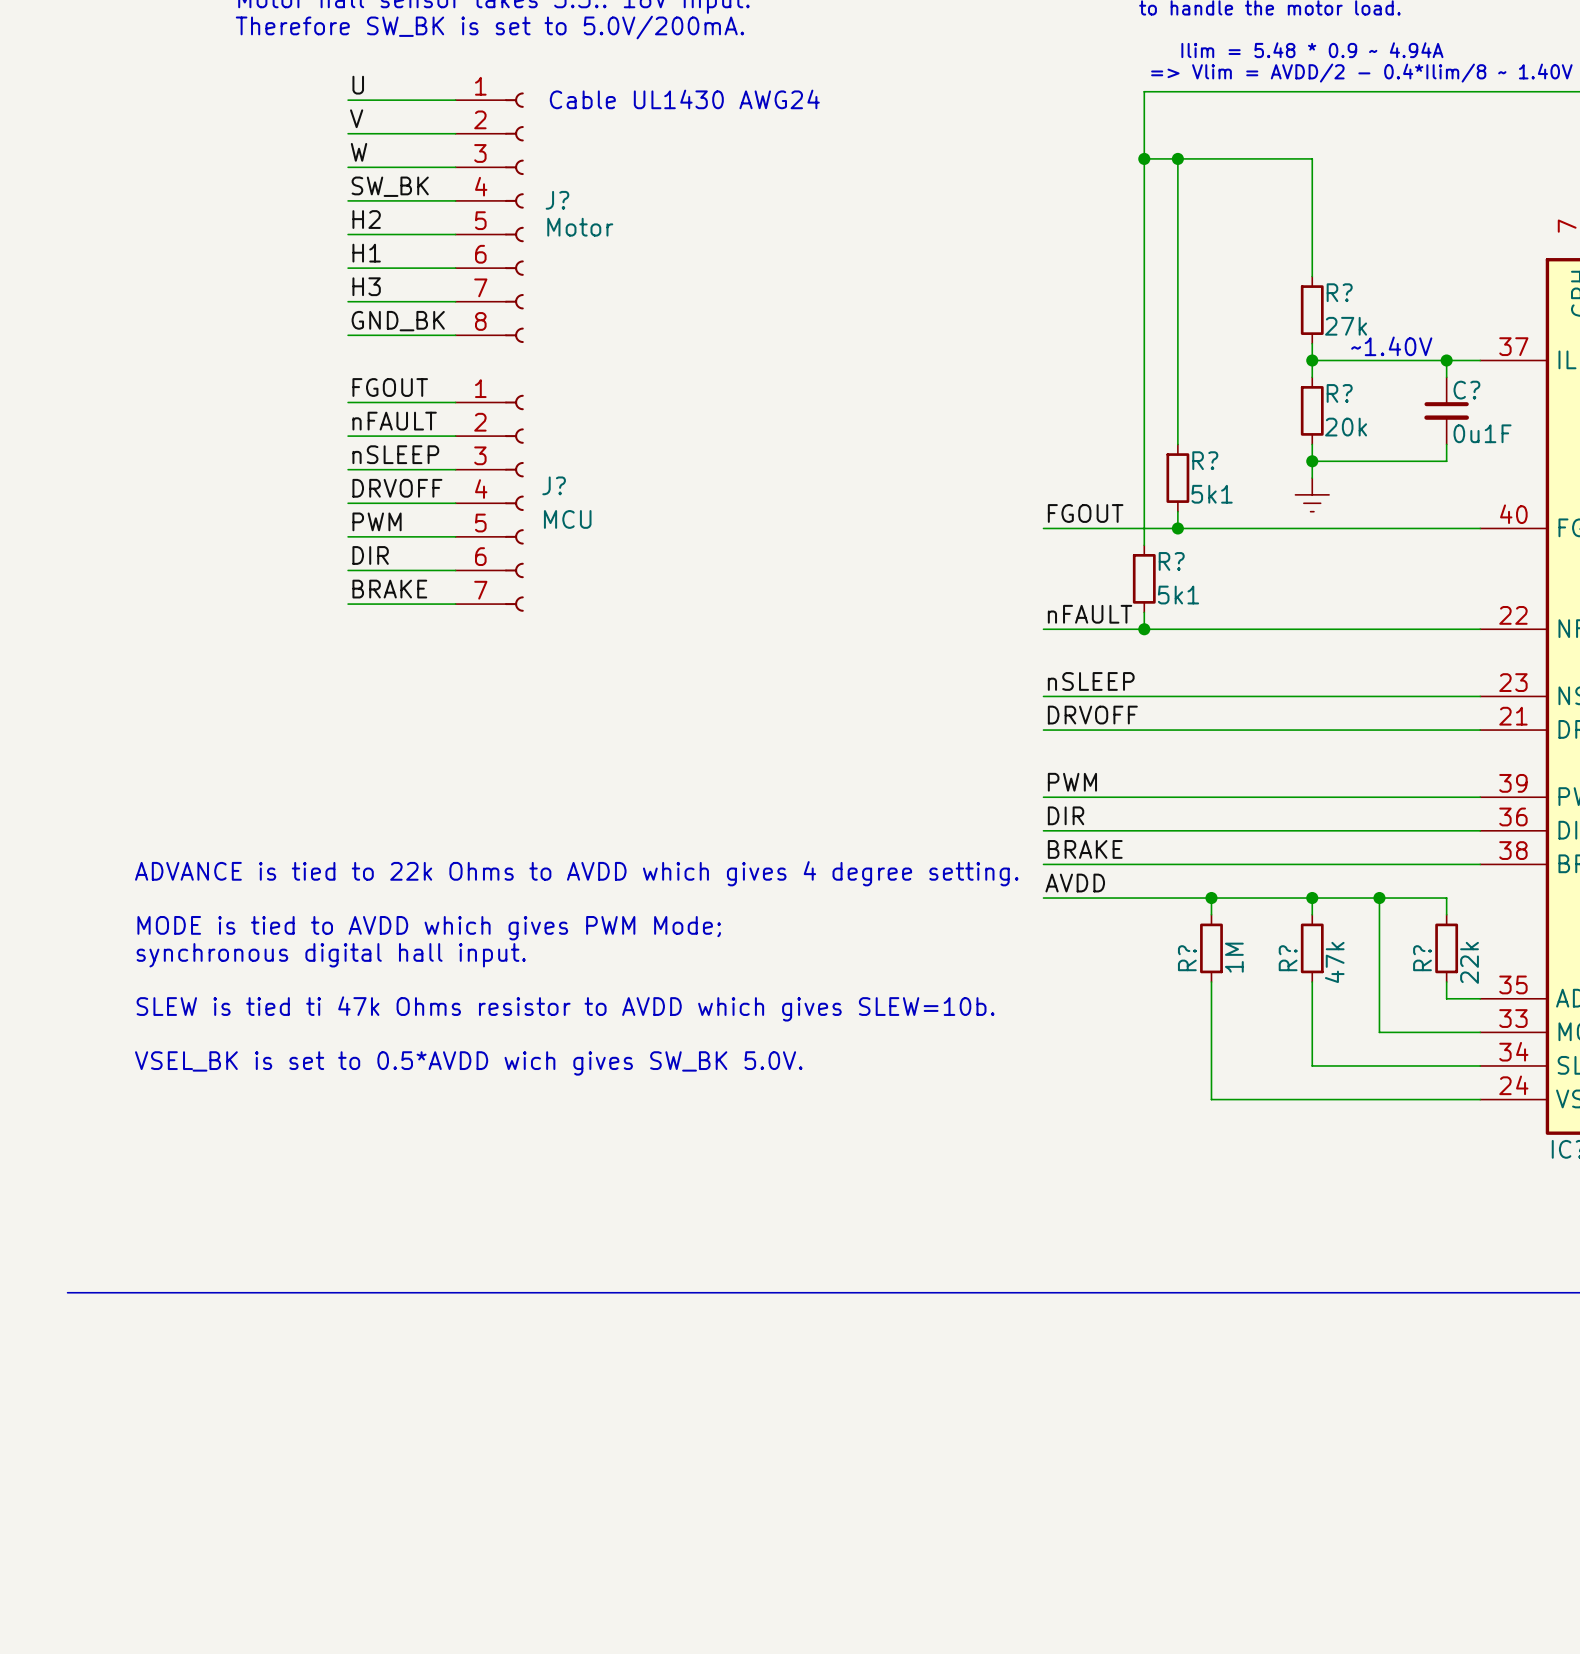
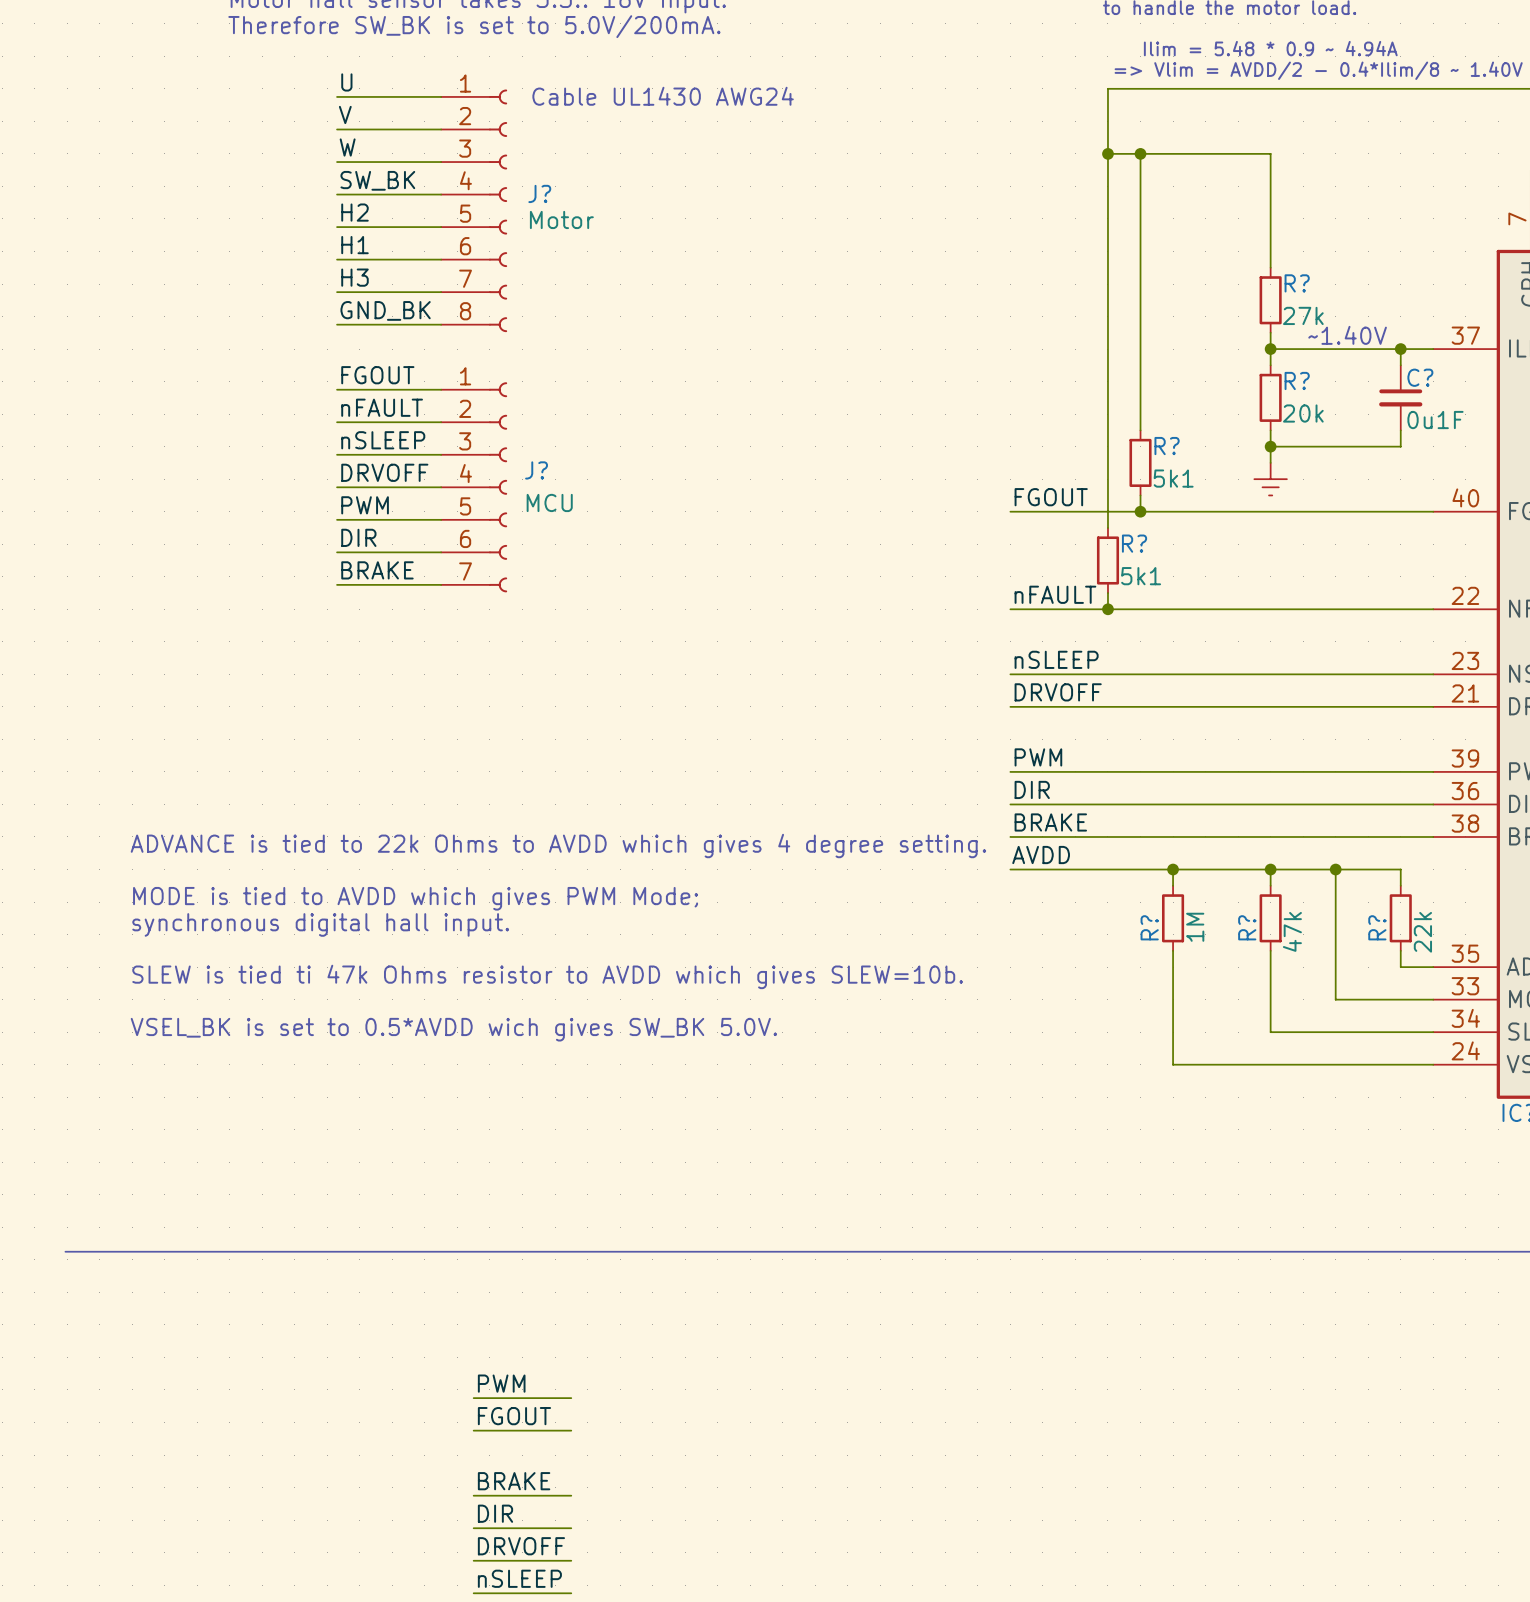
label: none -> PWM (501, 1383)
wire: none -> (473, 1398) (571, 1398)
label: none -> FGOUT (514, 1416)
wire: none -> (473, 1430) (571, 1430)
label: none -> BRAKE (514, 1481)
wire: none -> (473, 1495) (571, 1495)
label: none -> DIR (495, 1513)
wire: none -> (473, 1528) (571, 1528)
label: none -> DRVOFF (521, 1546)
wire: none -> (473, 1560) (571, 1560)
label: none -> nSLEEP (519, 1578)
wire: none -> (473, 1593) (571, 1593)

